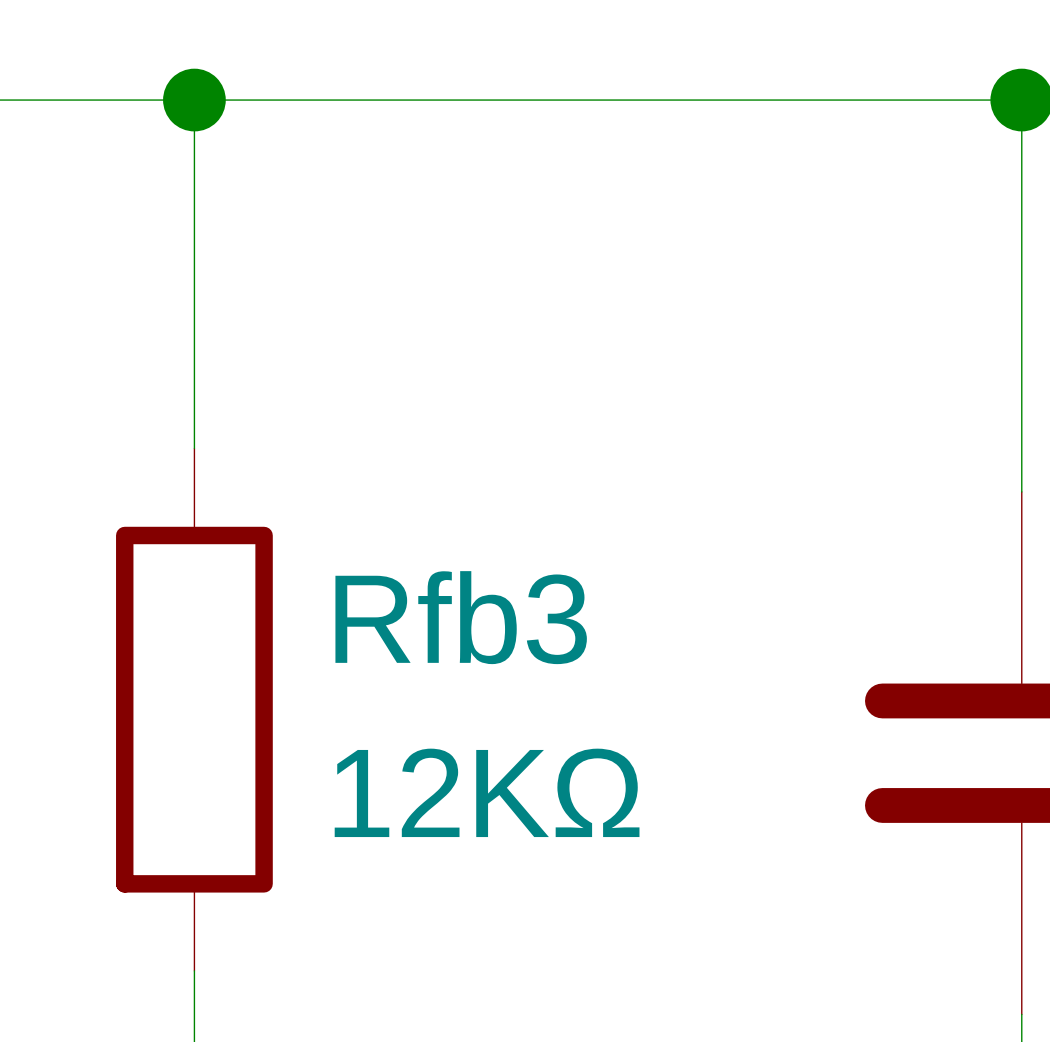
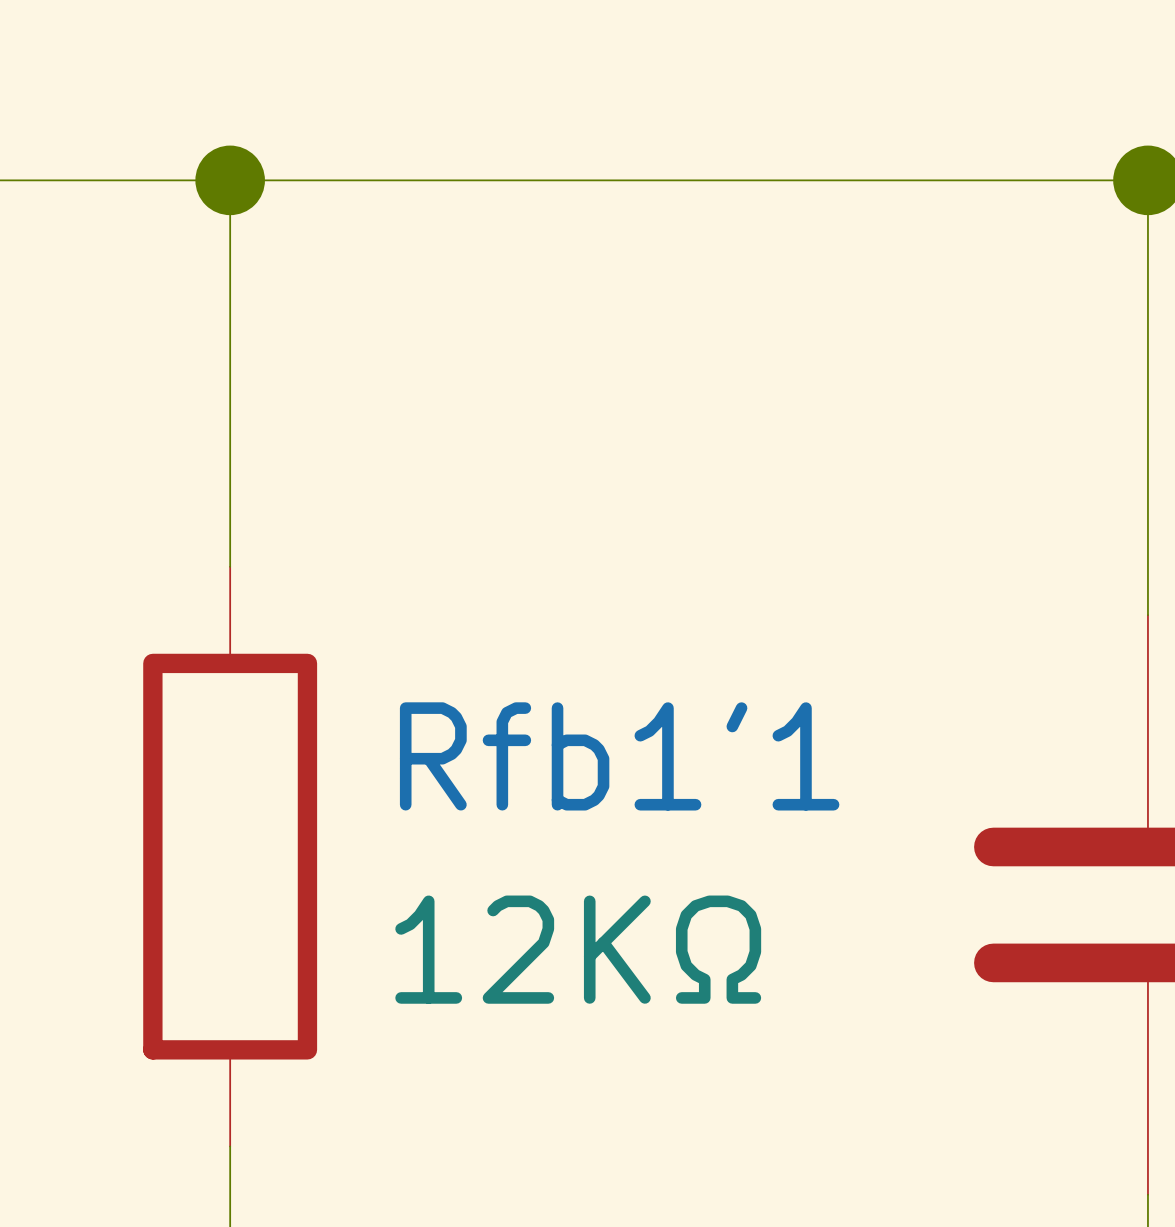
Rfb3 name: Rfb3 (461, 617) -> Rfb1'1 (619, 756)

